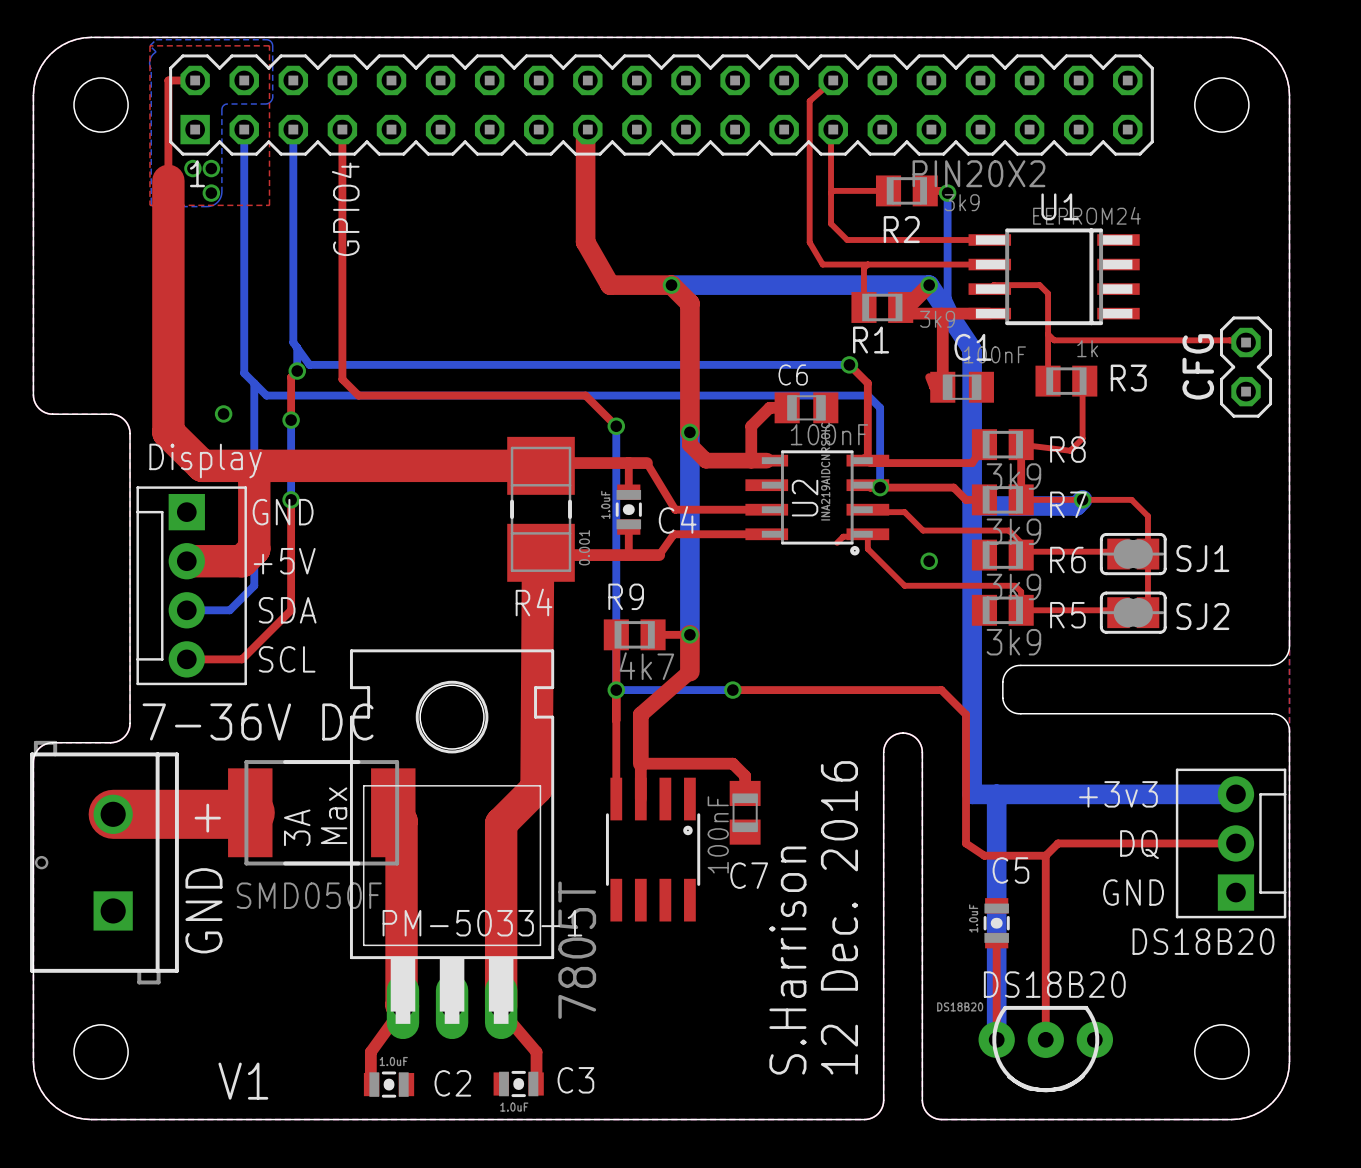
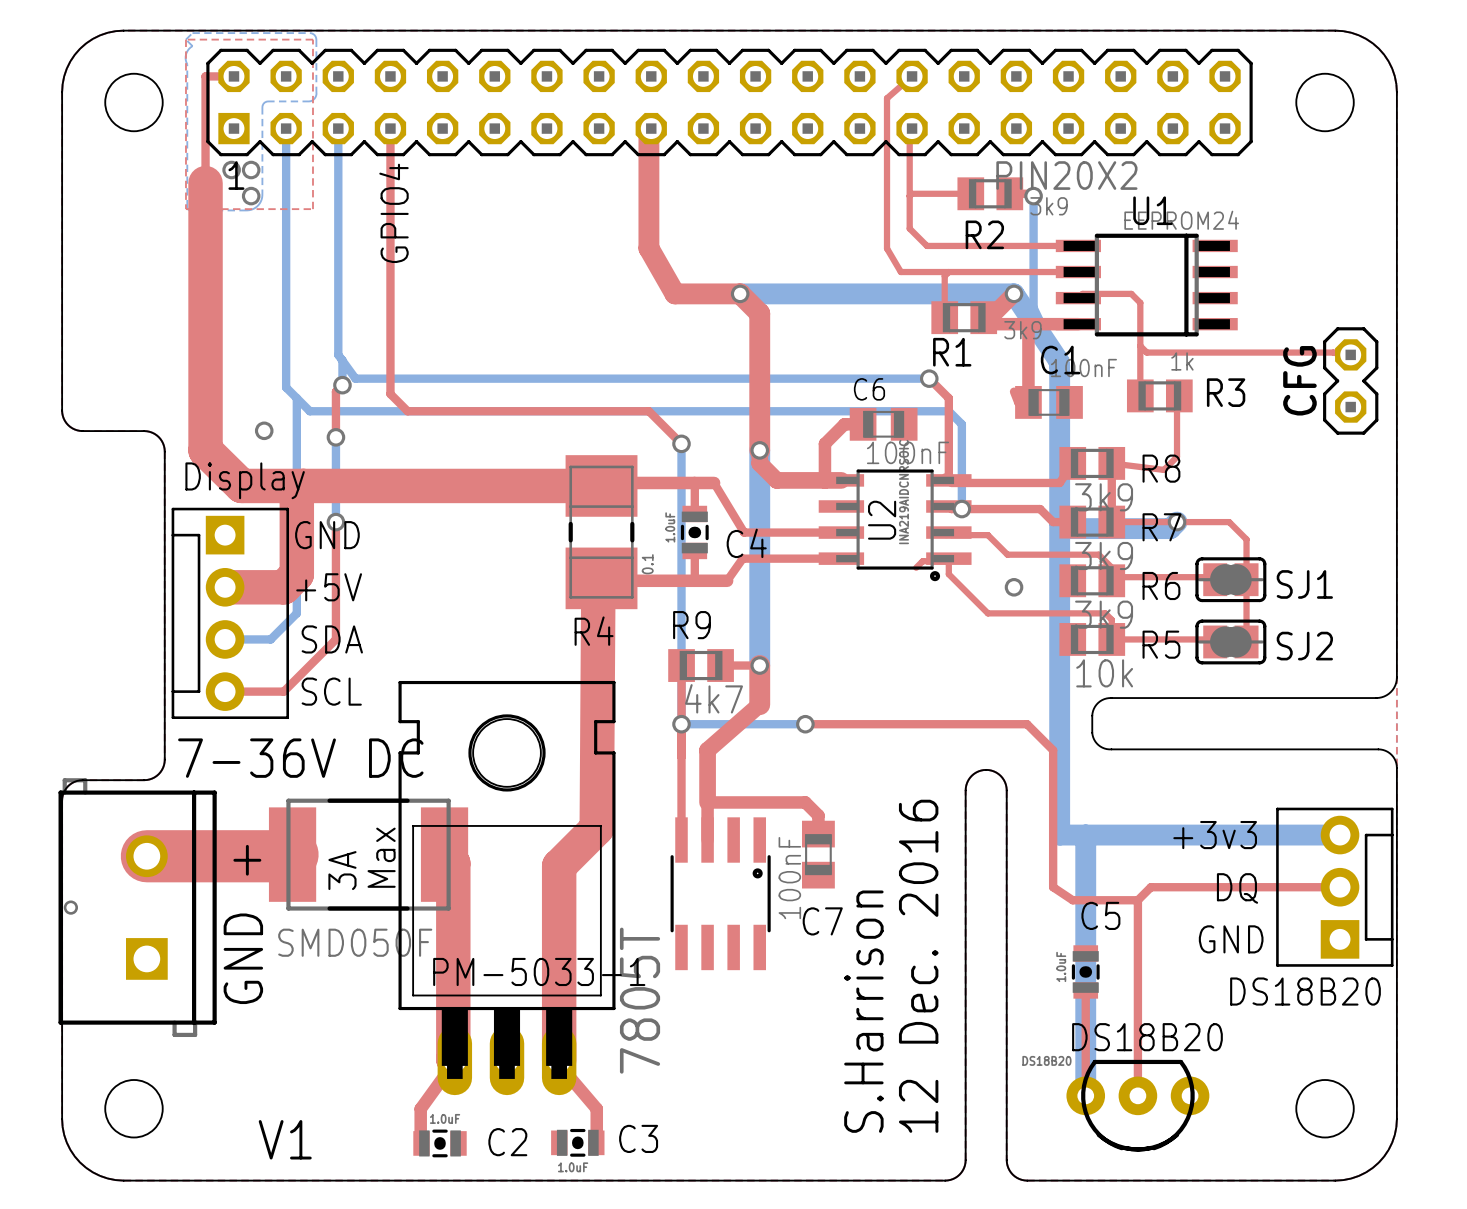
R4 value: 0.001 (584, 547) -> 0.1 (647, 564)
R5 value: 3k9 (1013, 642) -> 10k (1104, 673)

